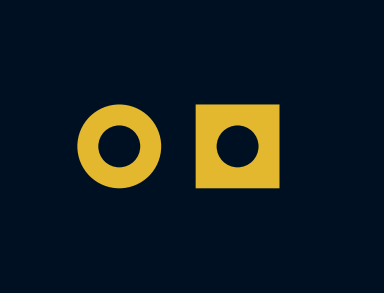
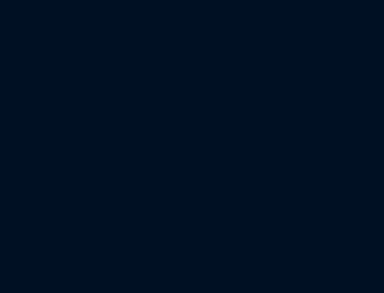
part: (178, 146) -> none

